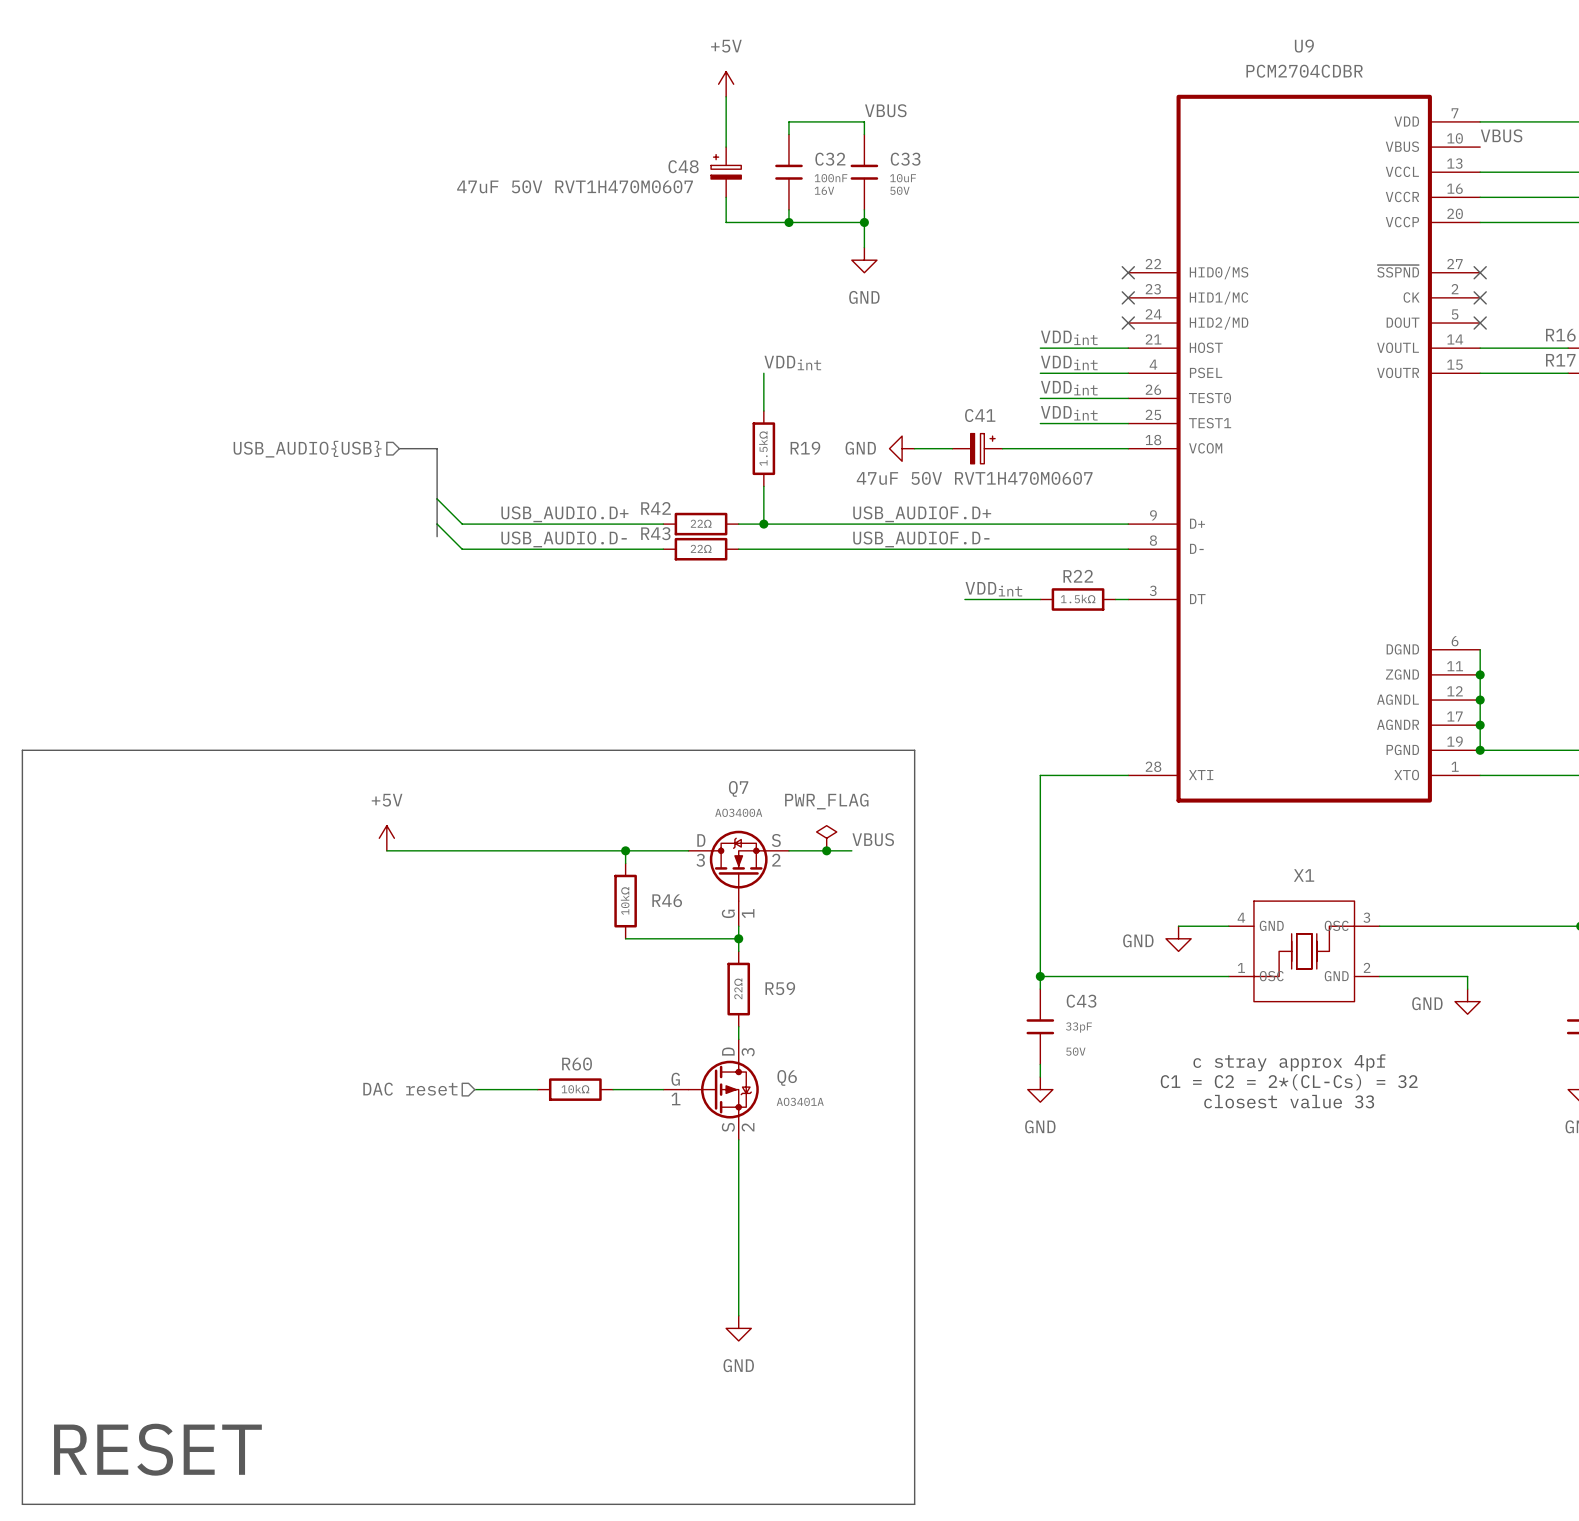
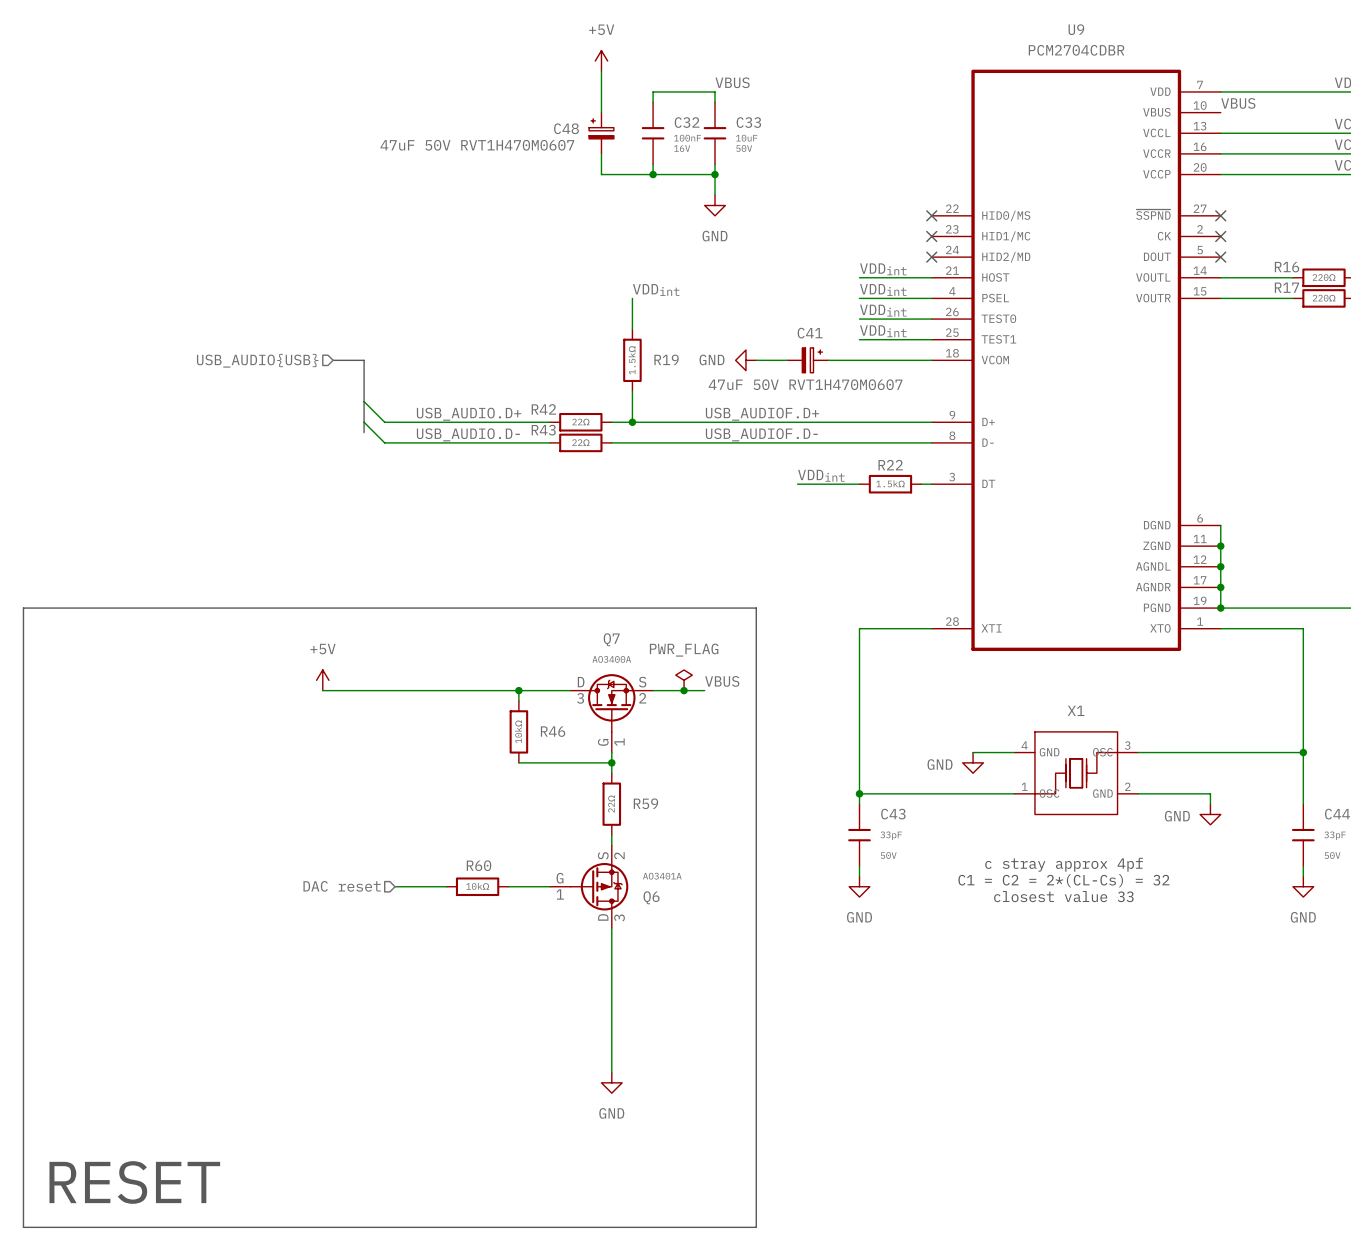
Q6 flip: as is (723, 1089) -> up-down (599, 886)

